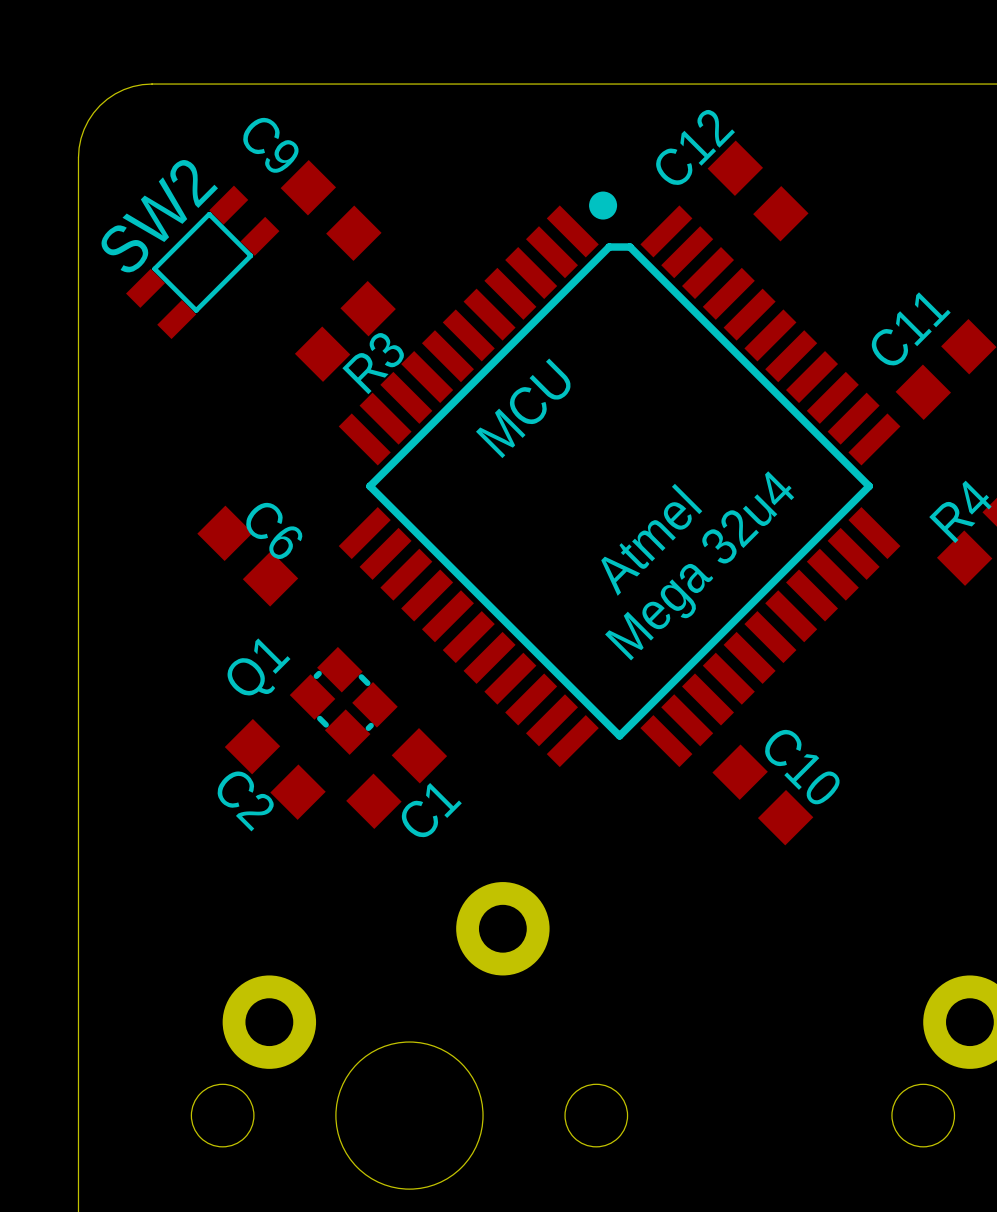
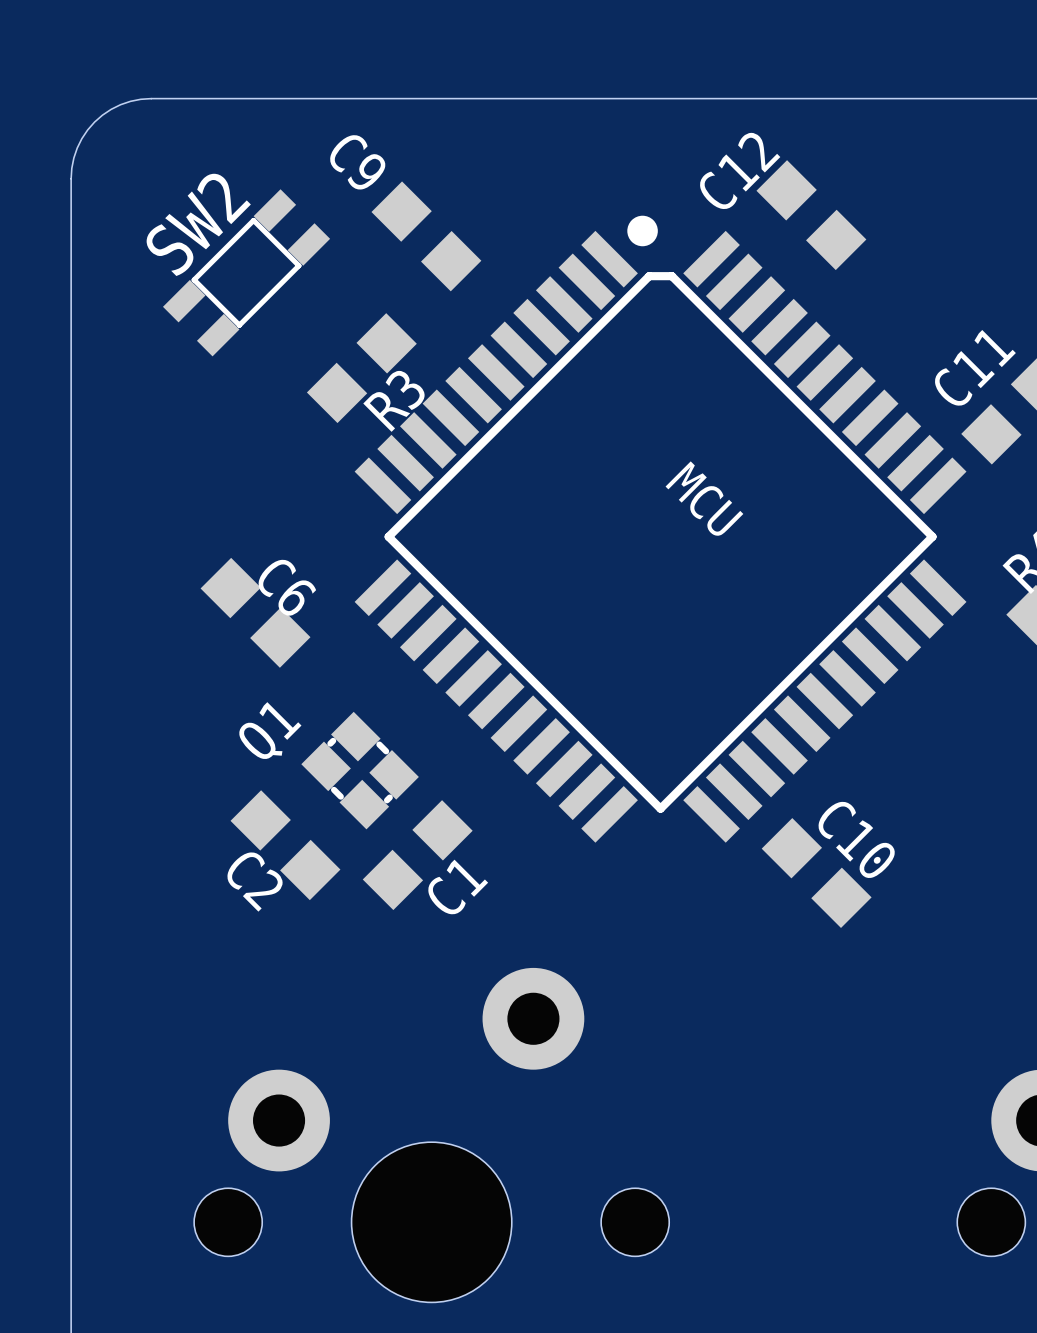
C9 position: (331, 210) -> (426, 236)
SW2 position: (202, 262) -> (246, 272)
text: MCU (523, 408) -> none
MCU name: none -> MCU (704, 498)
text: Atmel (651, 539) -> none
text: Mega 32u4 (699, 565) -> none

